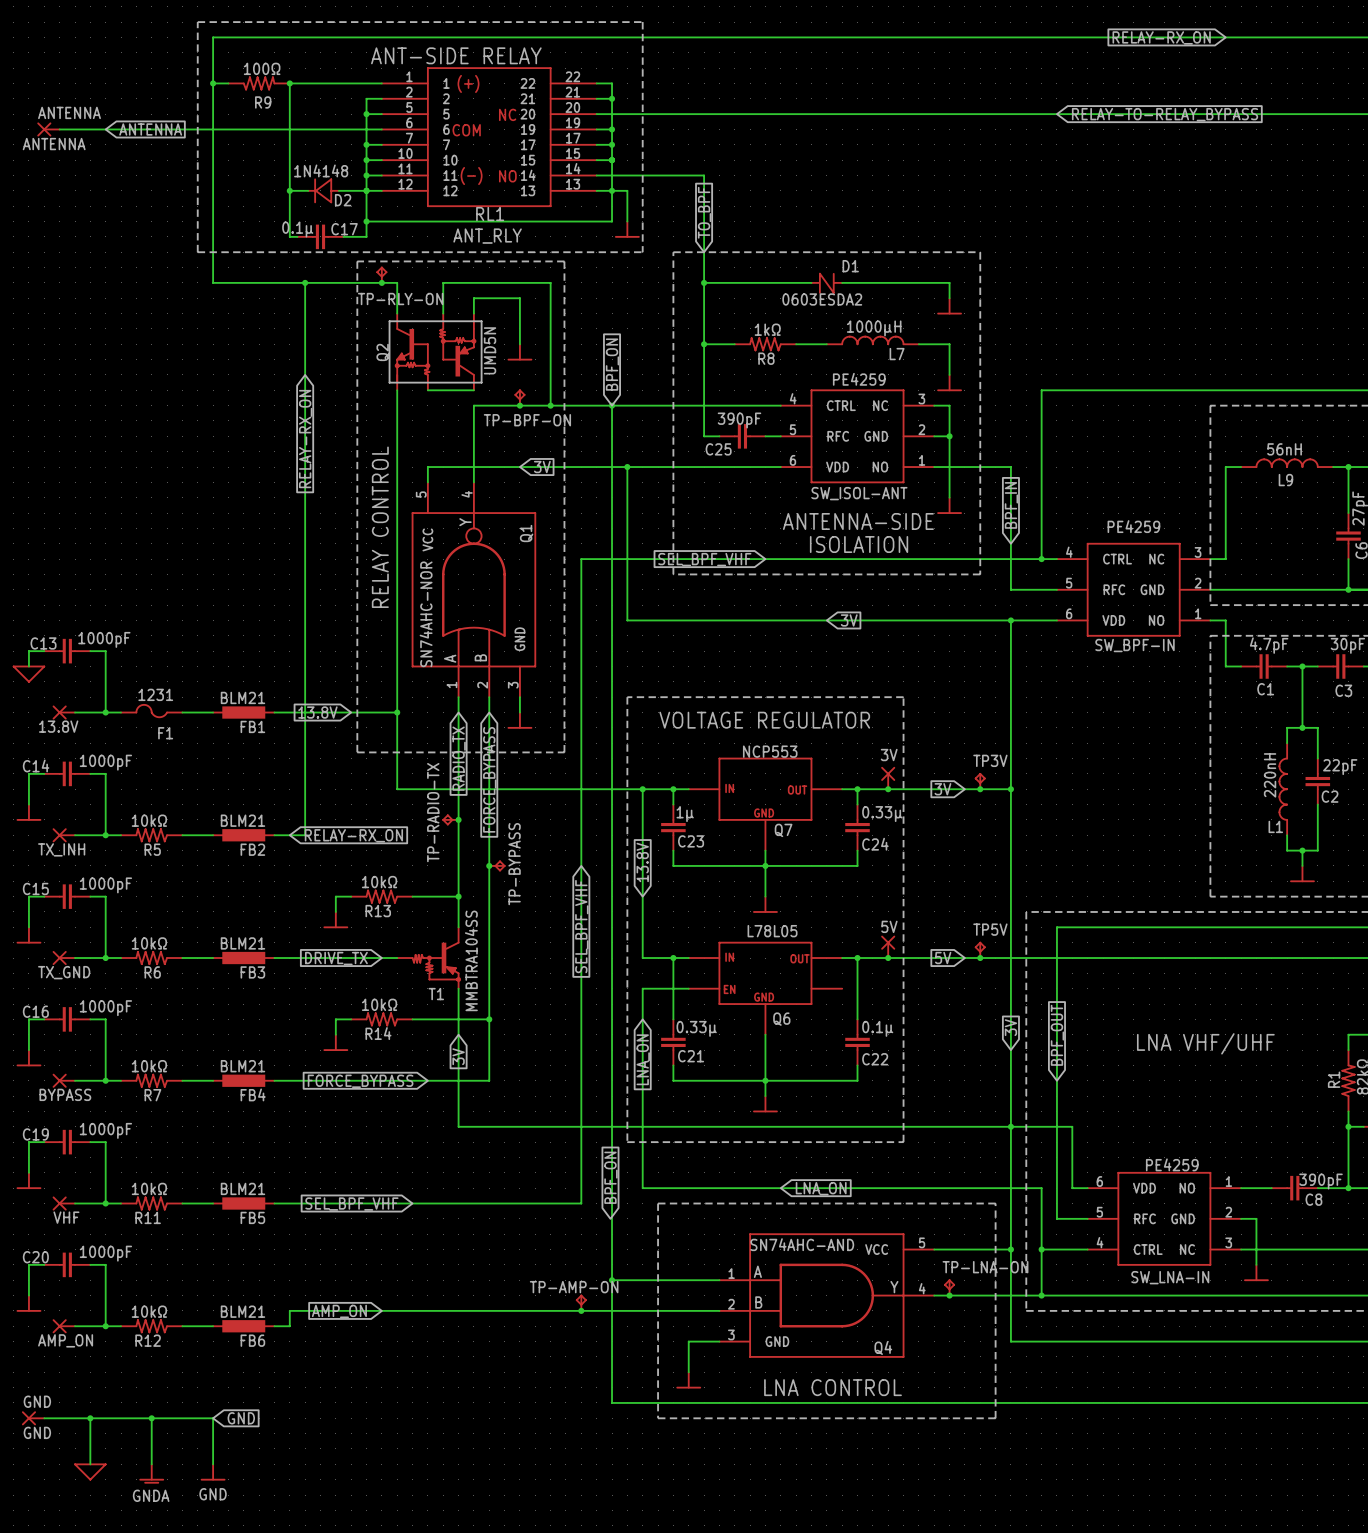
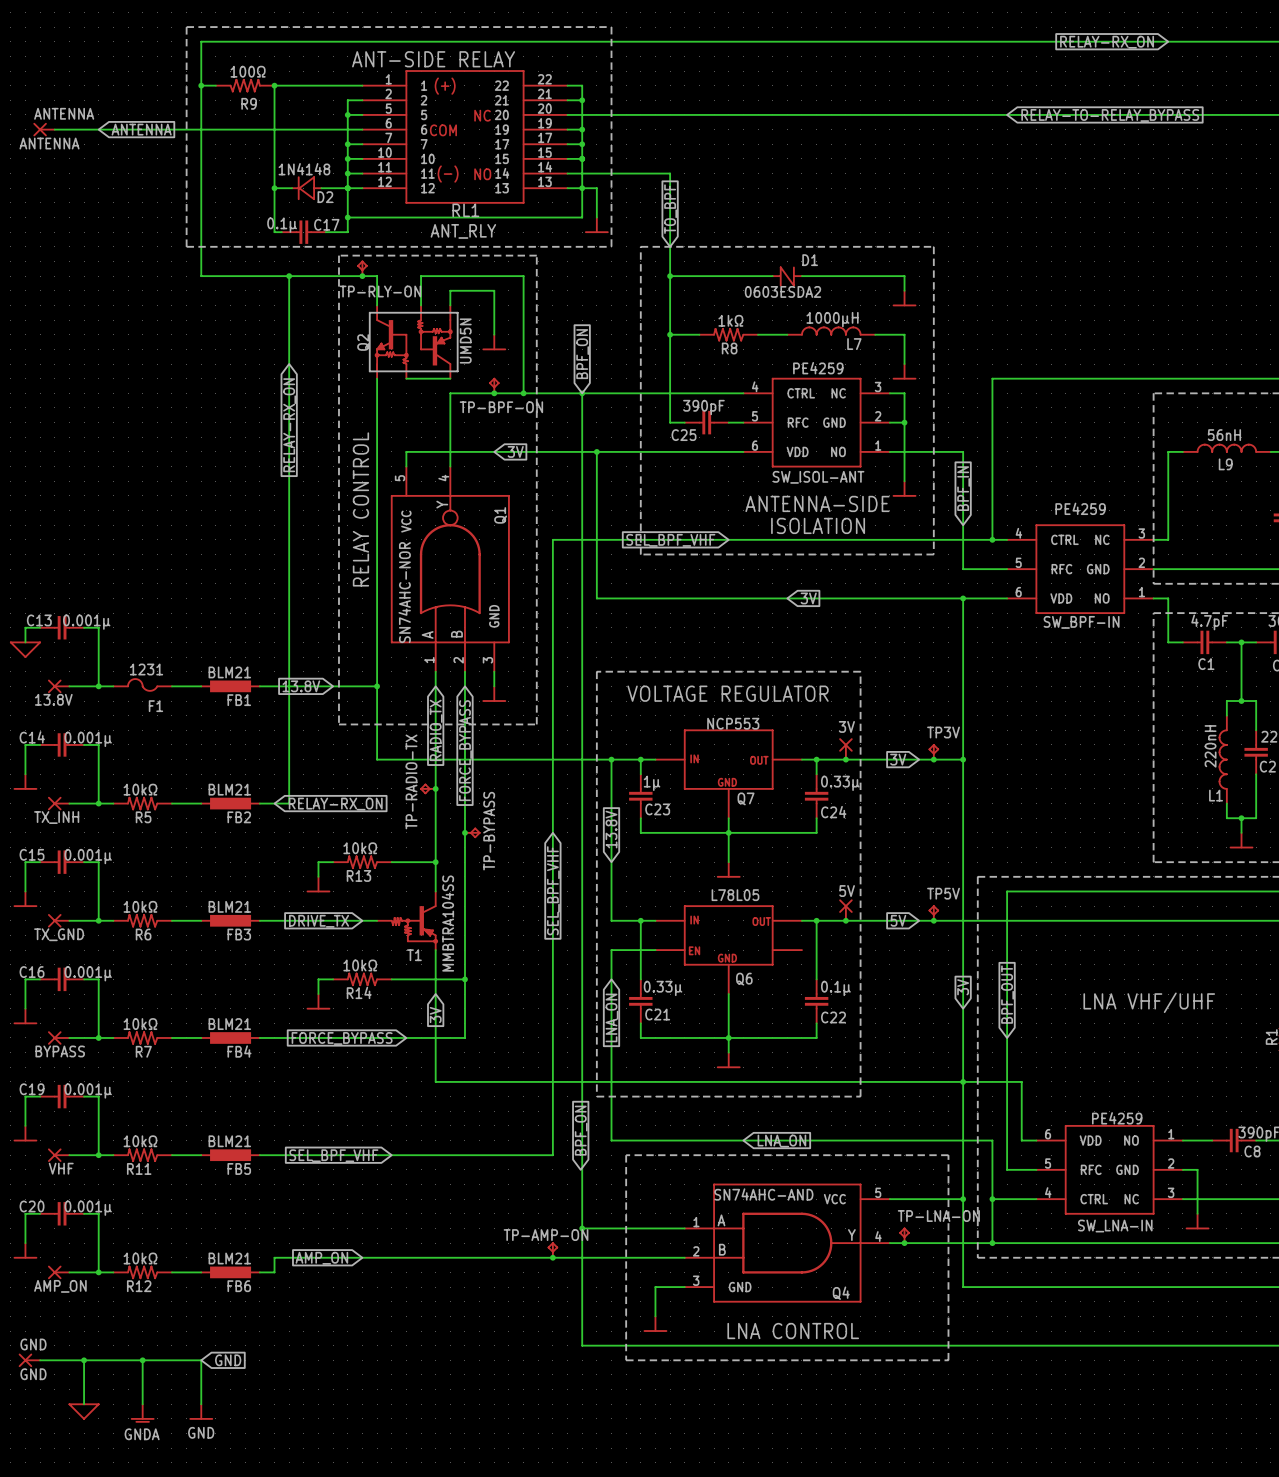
C13 value: 1000pF (104, 639) -> 0.001µ (86, 622)
C14 value: 1000pF (105, 762) -> 0.001µ (88, 739)
C15 value: 1000pF (105, 885) -> 0.001µ (88, 856)
C16 value: 1000pF (105, 1008) -> 0.001µ (88, 973)
C19 value: 1000pF (105, 1130) -> 0.001µ (88, 1090)
C20 value: 1000pF (105, 1253) -> 0.001µ (88, 1208)

